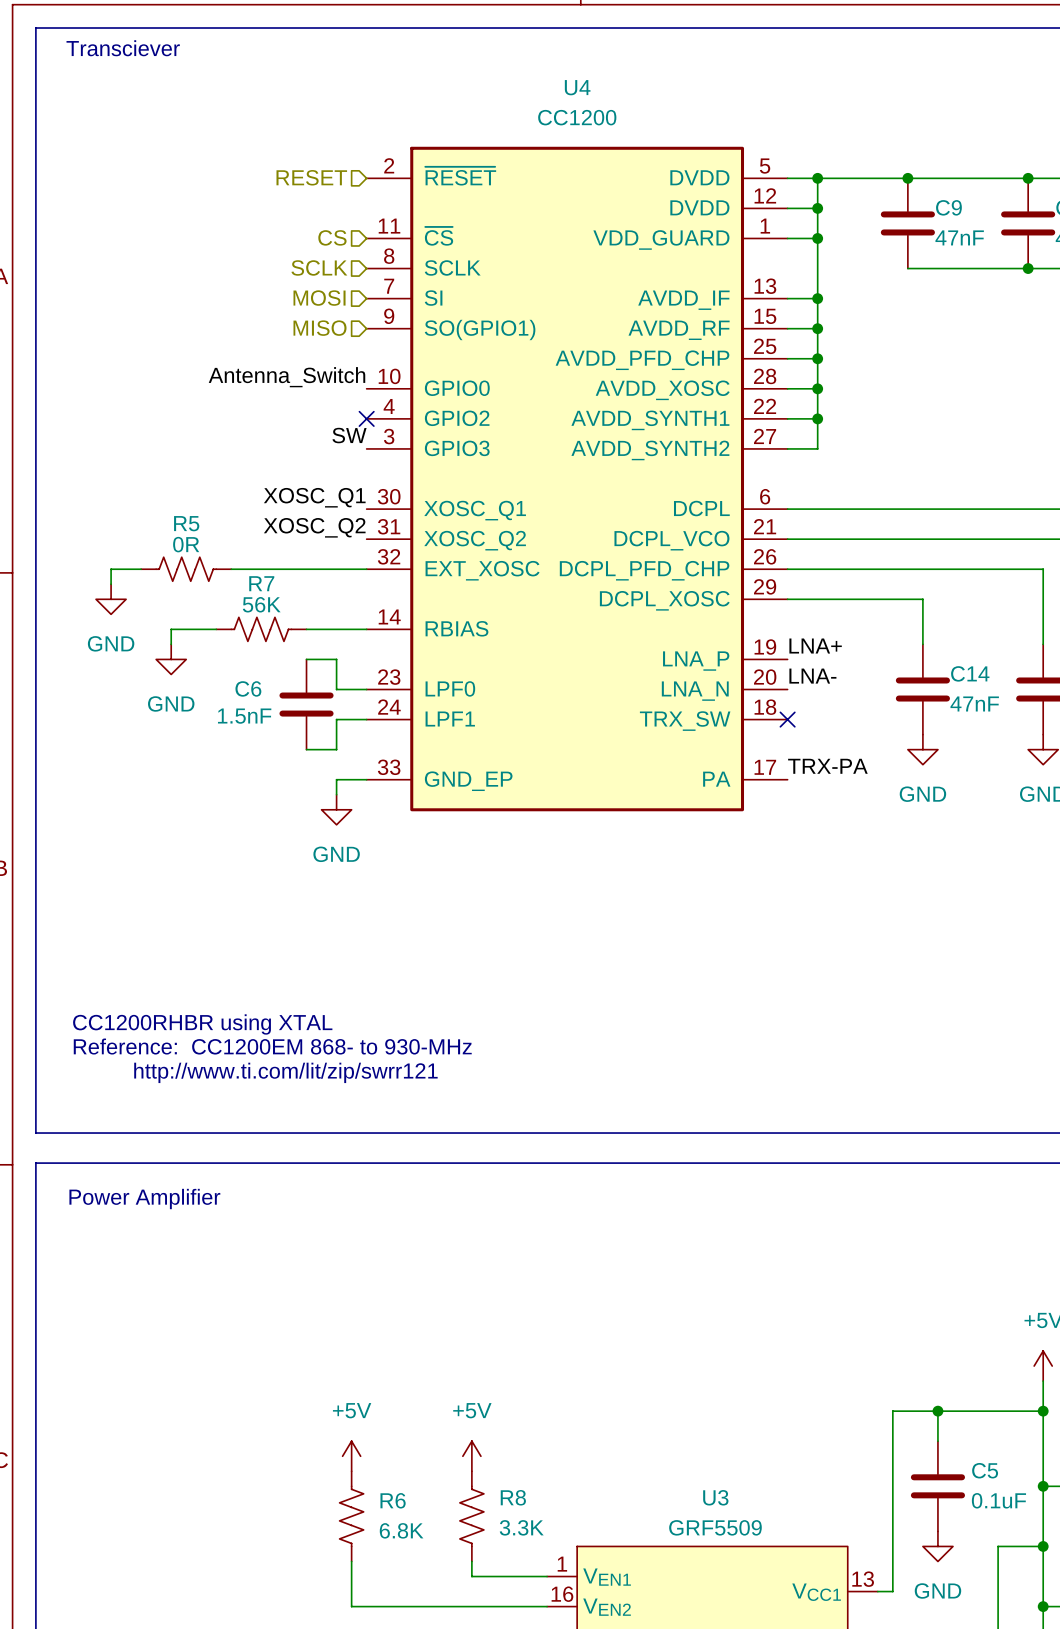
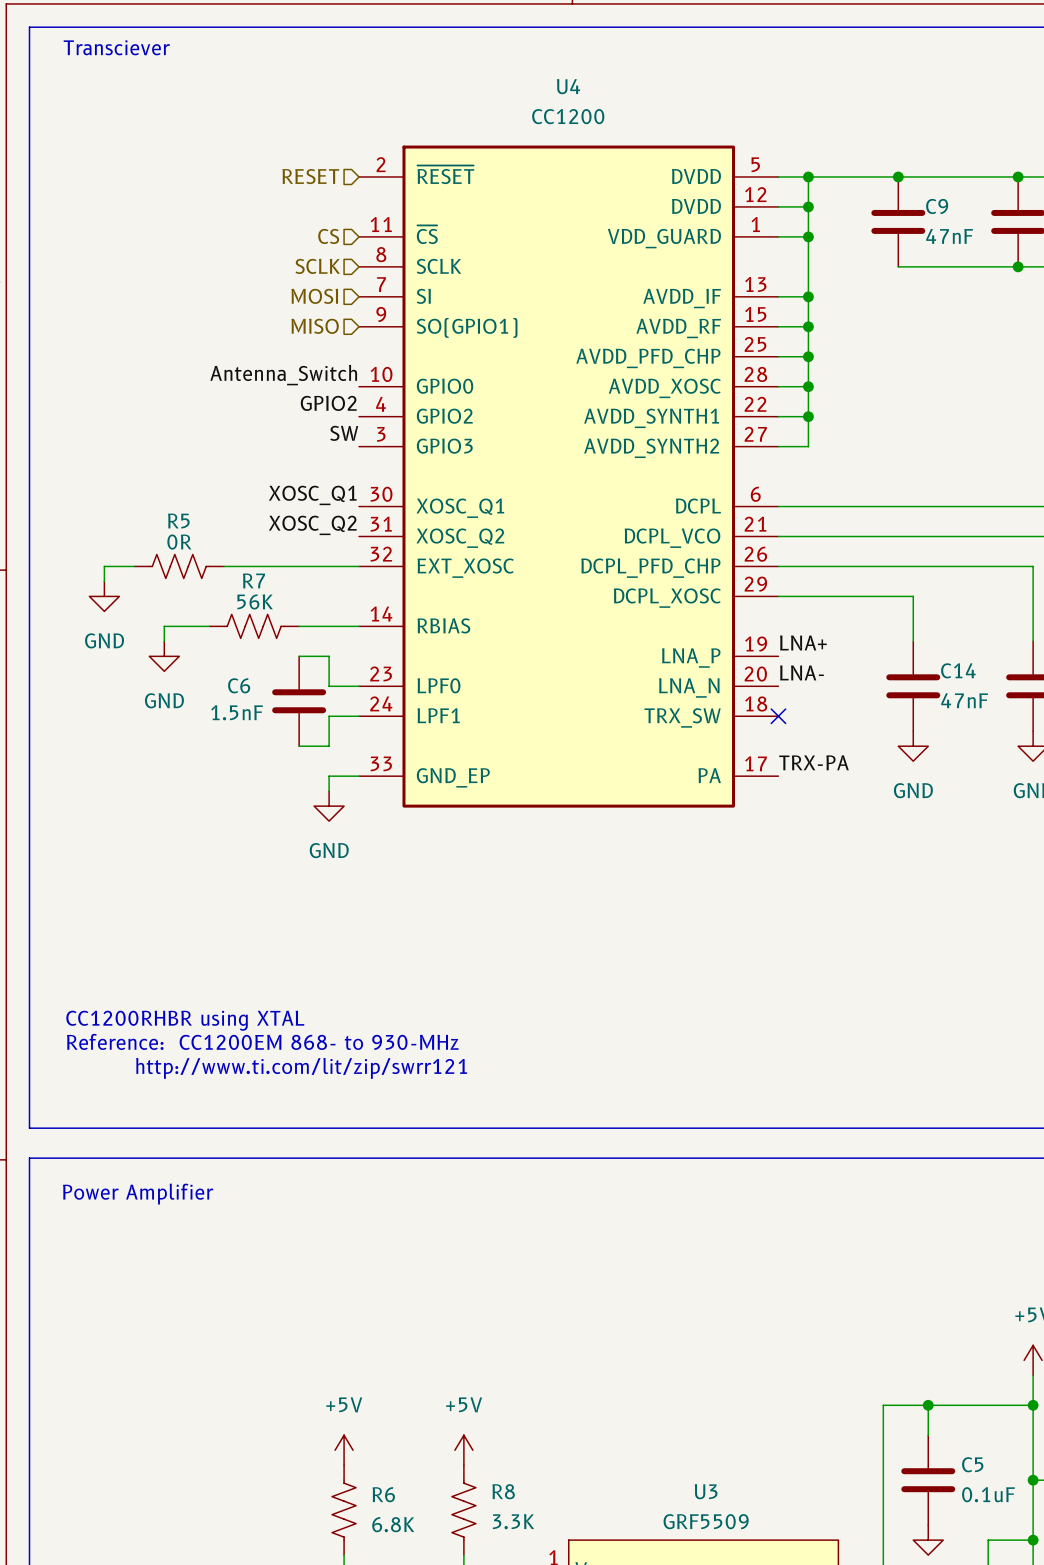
label: none -> GPIO2 (328, 403)
no-connect mark: (366, 418) -> none

